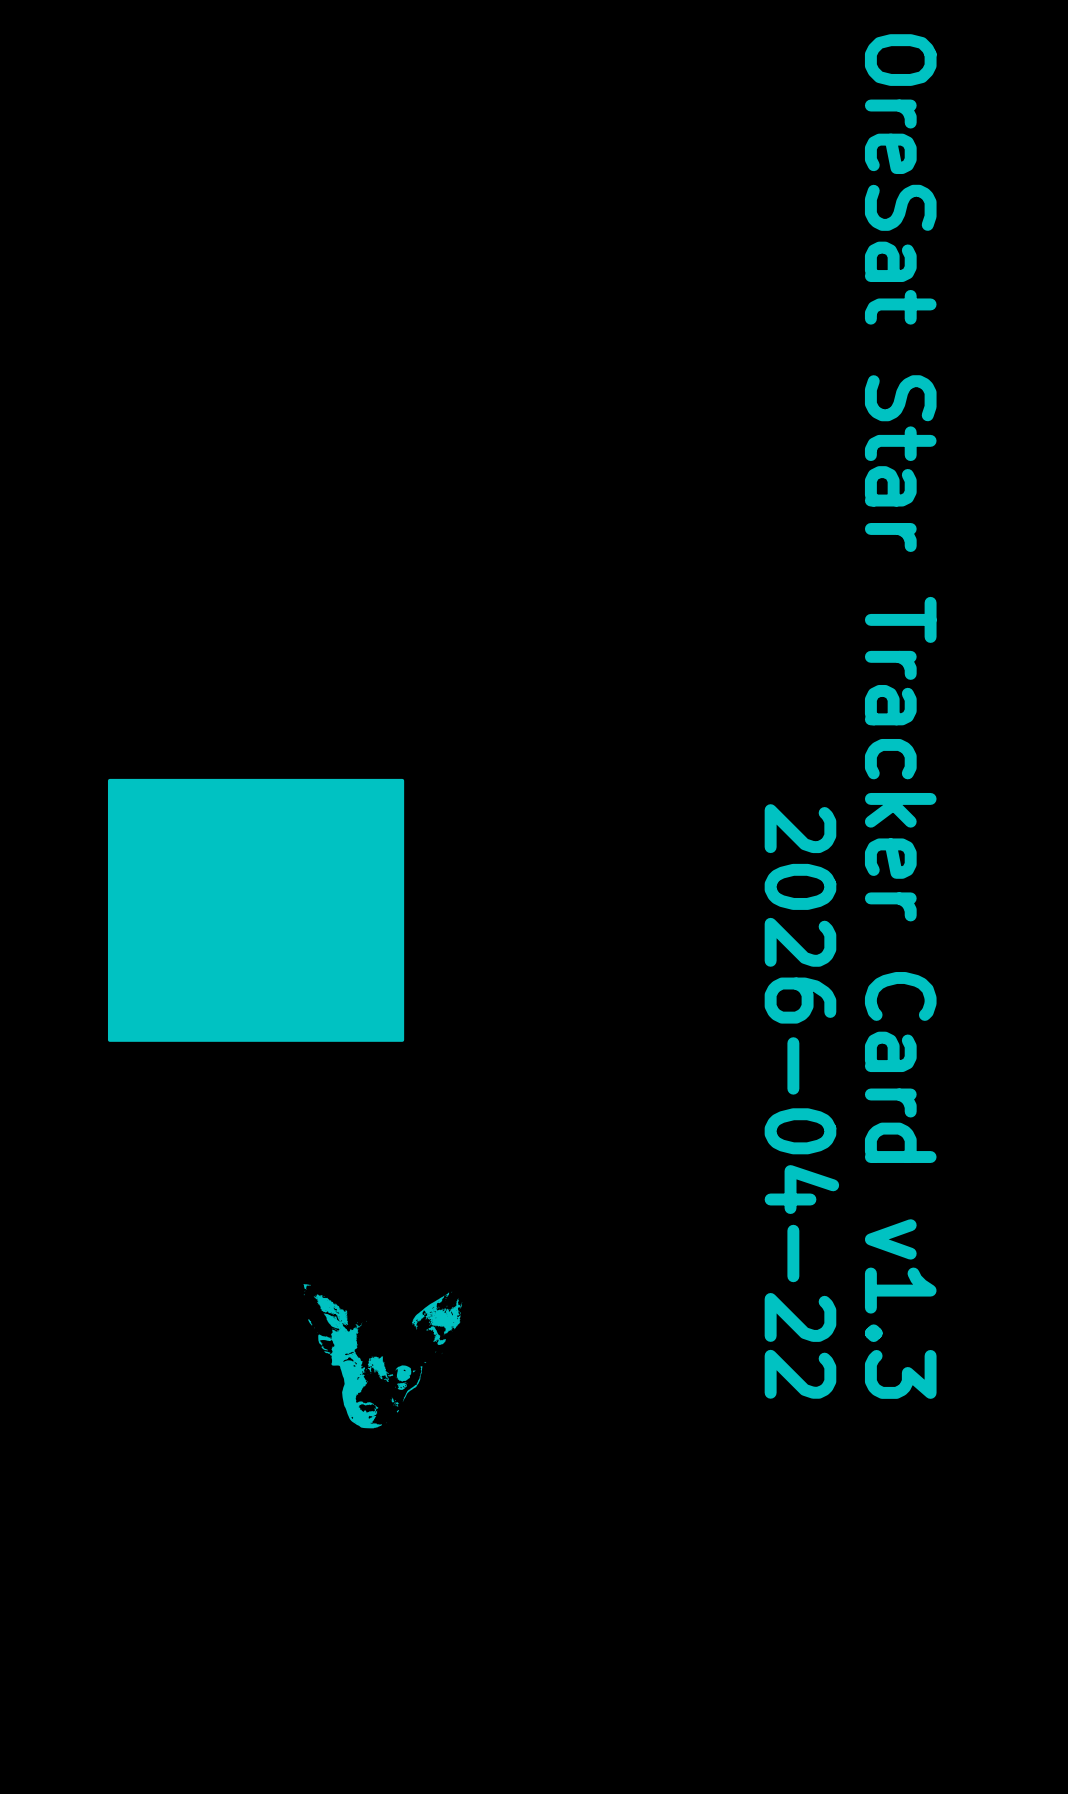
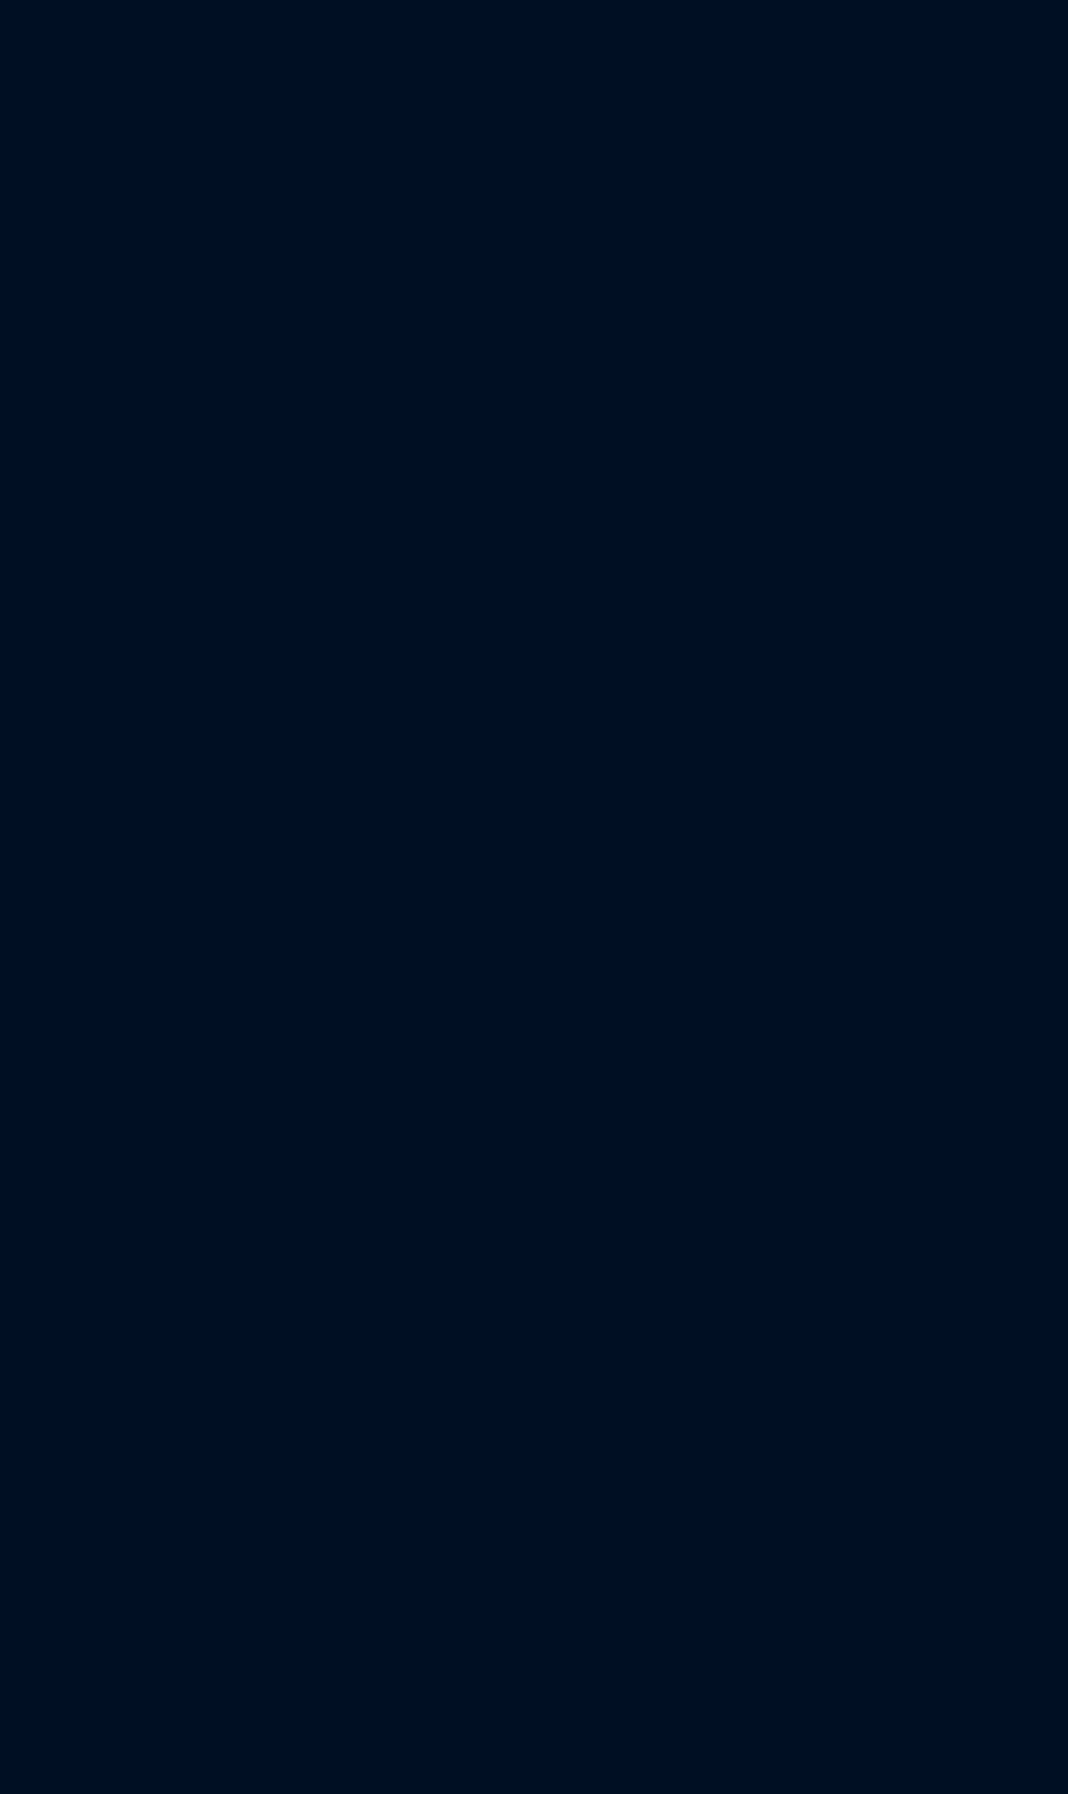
text: OreSat Star Tracker Card v1.3 (900, 716) -> none
drawing: [107, 778, 405, 1042] -> none
text: 2026-04-22 (801, 1101) -> none
drawing: [303, 1284, 463, 1429] -> none

